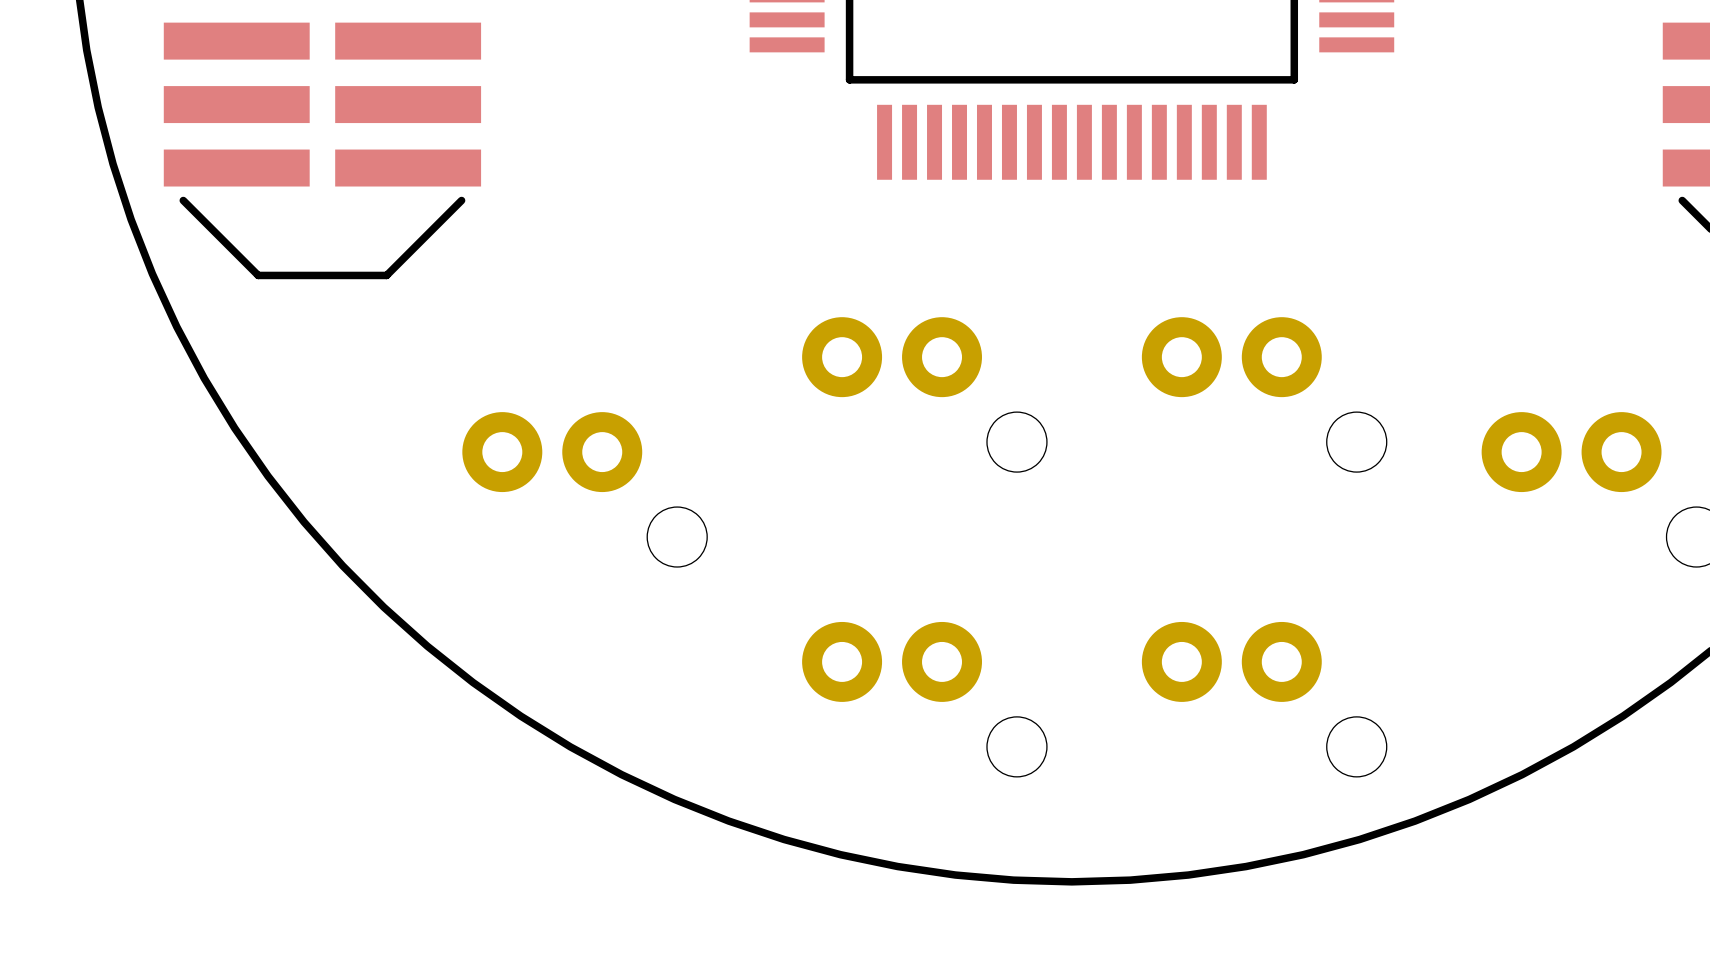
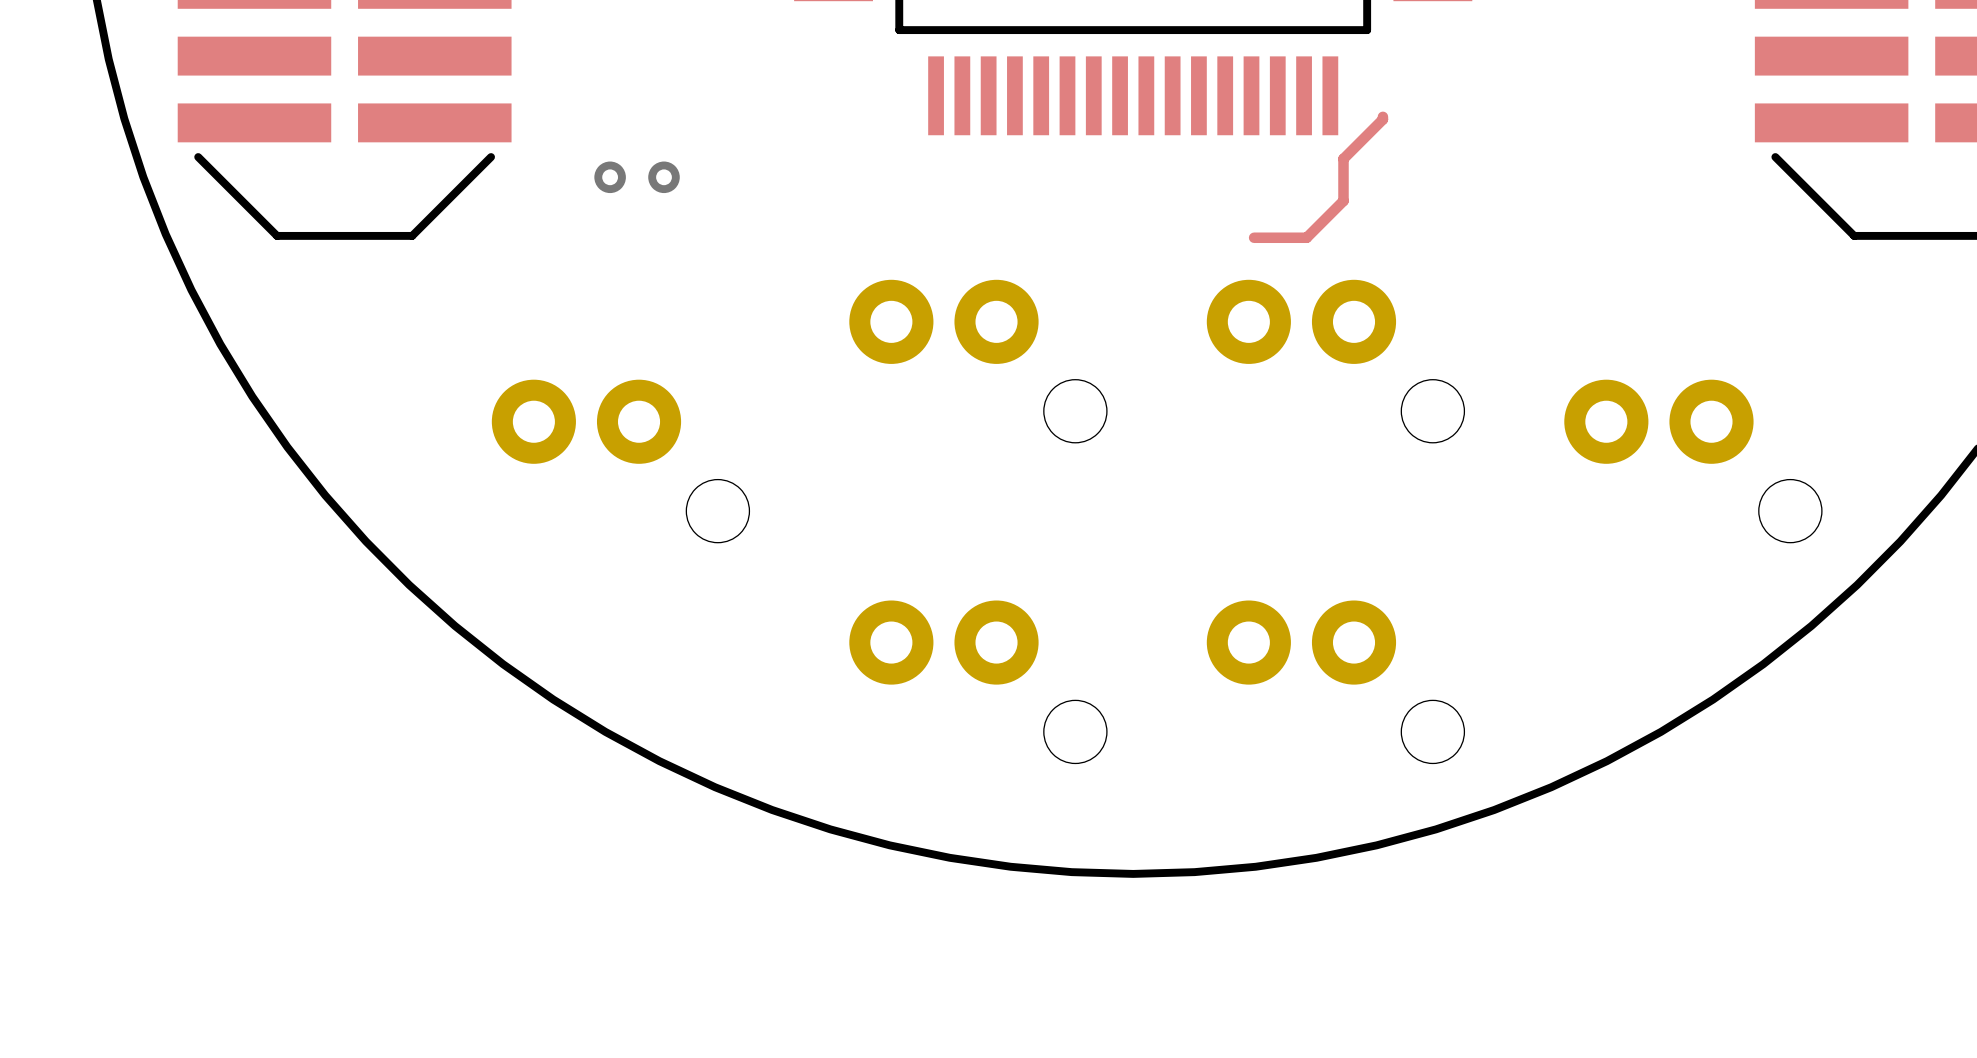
top track: none -> (1382, 116) (1382, 119) (1343, 158) (1343, 200) (1306, 237) (1254, 237)
via: none -> (610, 177)
via: none -> (664, 177)

